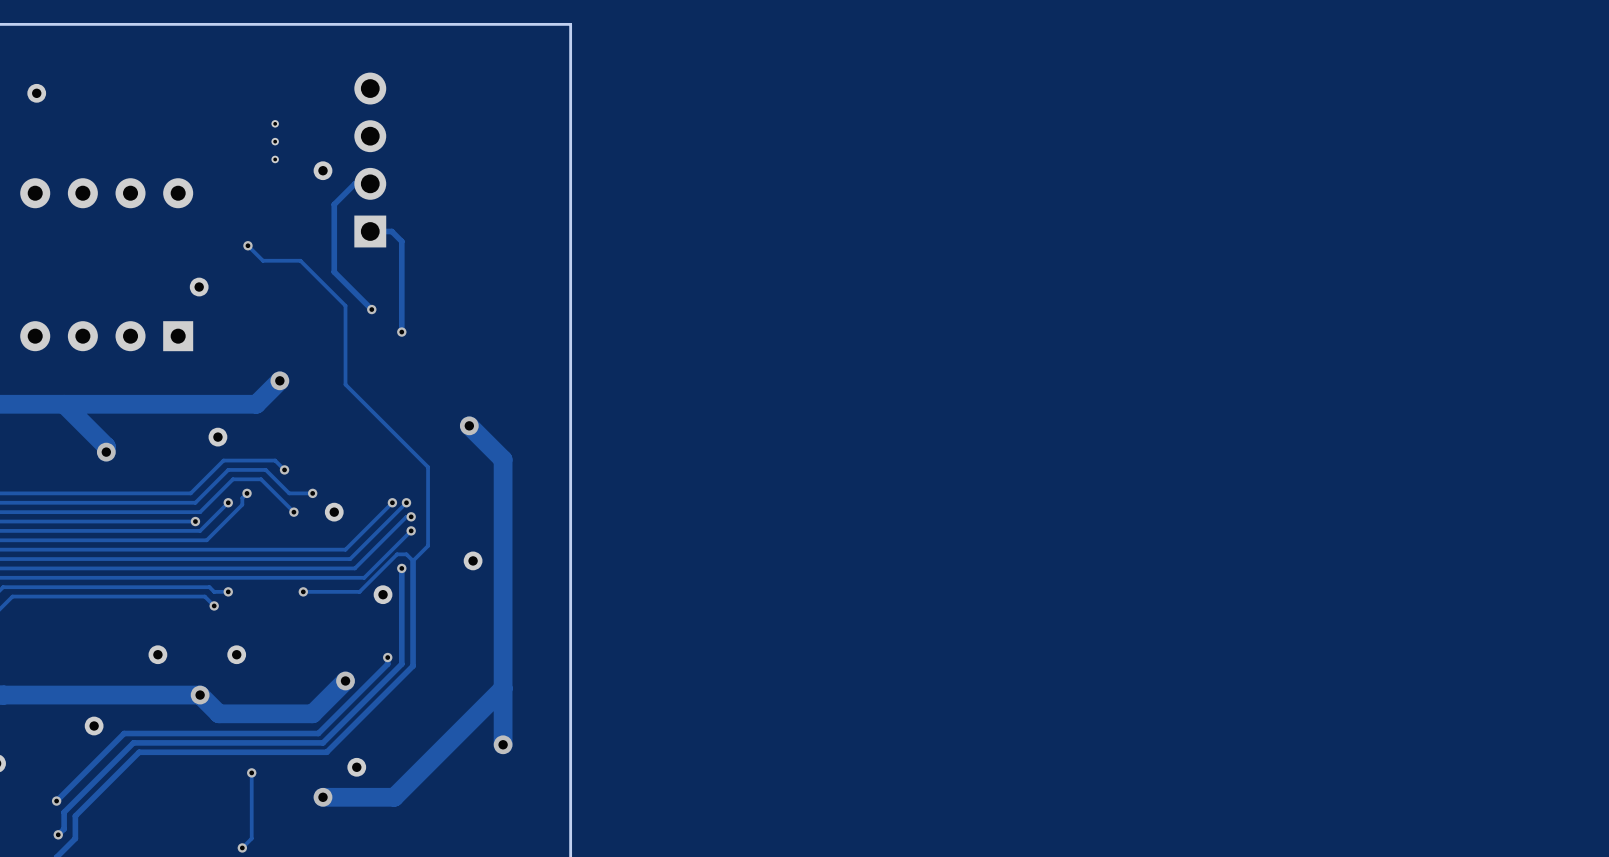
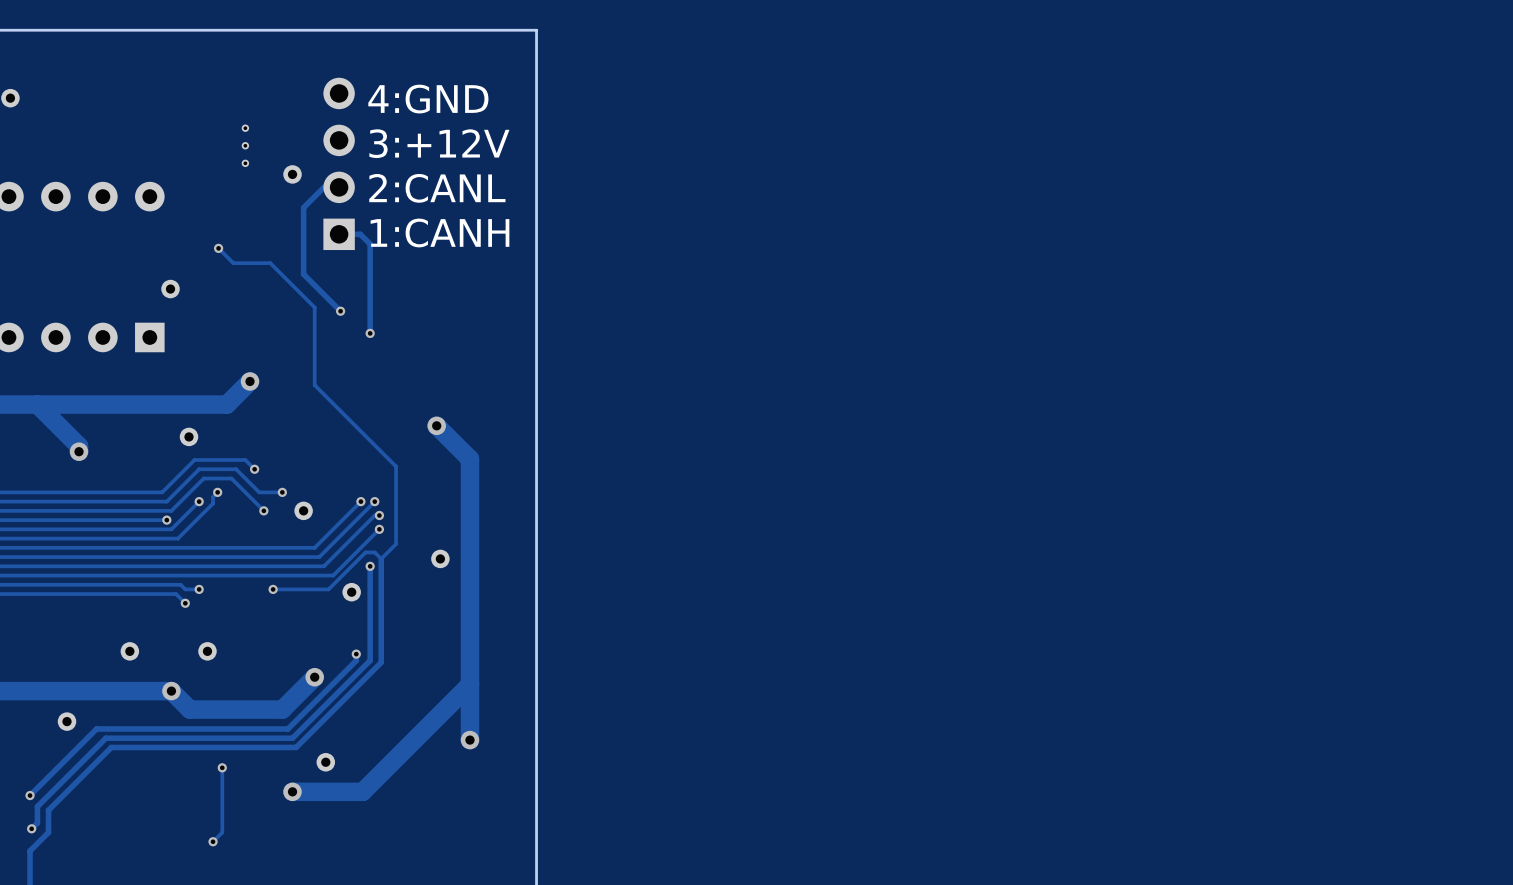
text: none -> 4:GND (428, 99)
text: none -> 3:+12V (439, 143)
text: none -> 2:CANL (437, 188)
text: none -> 1:CANH (440, 232)

